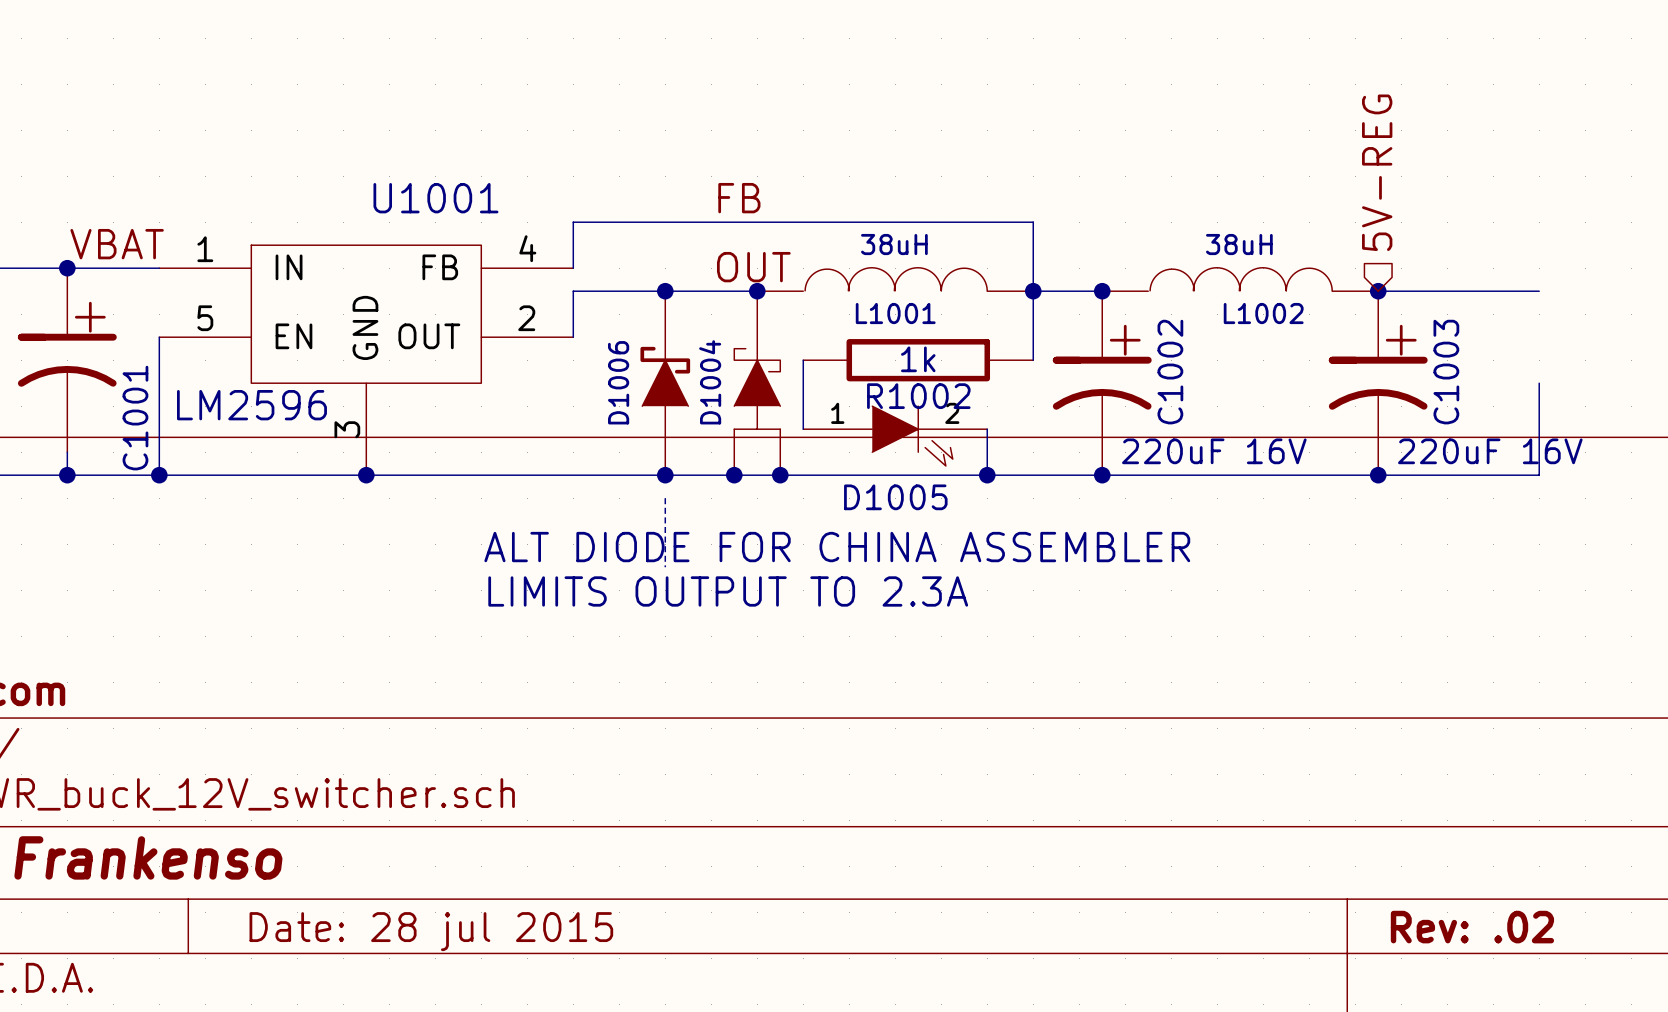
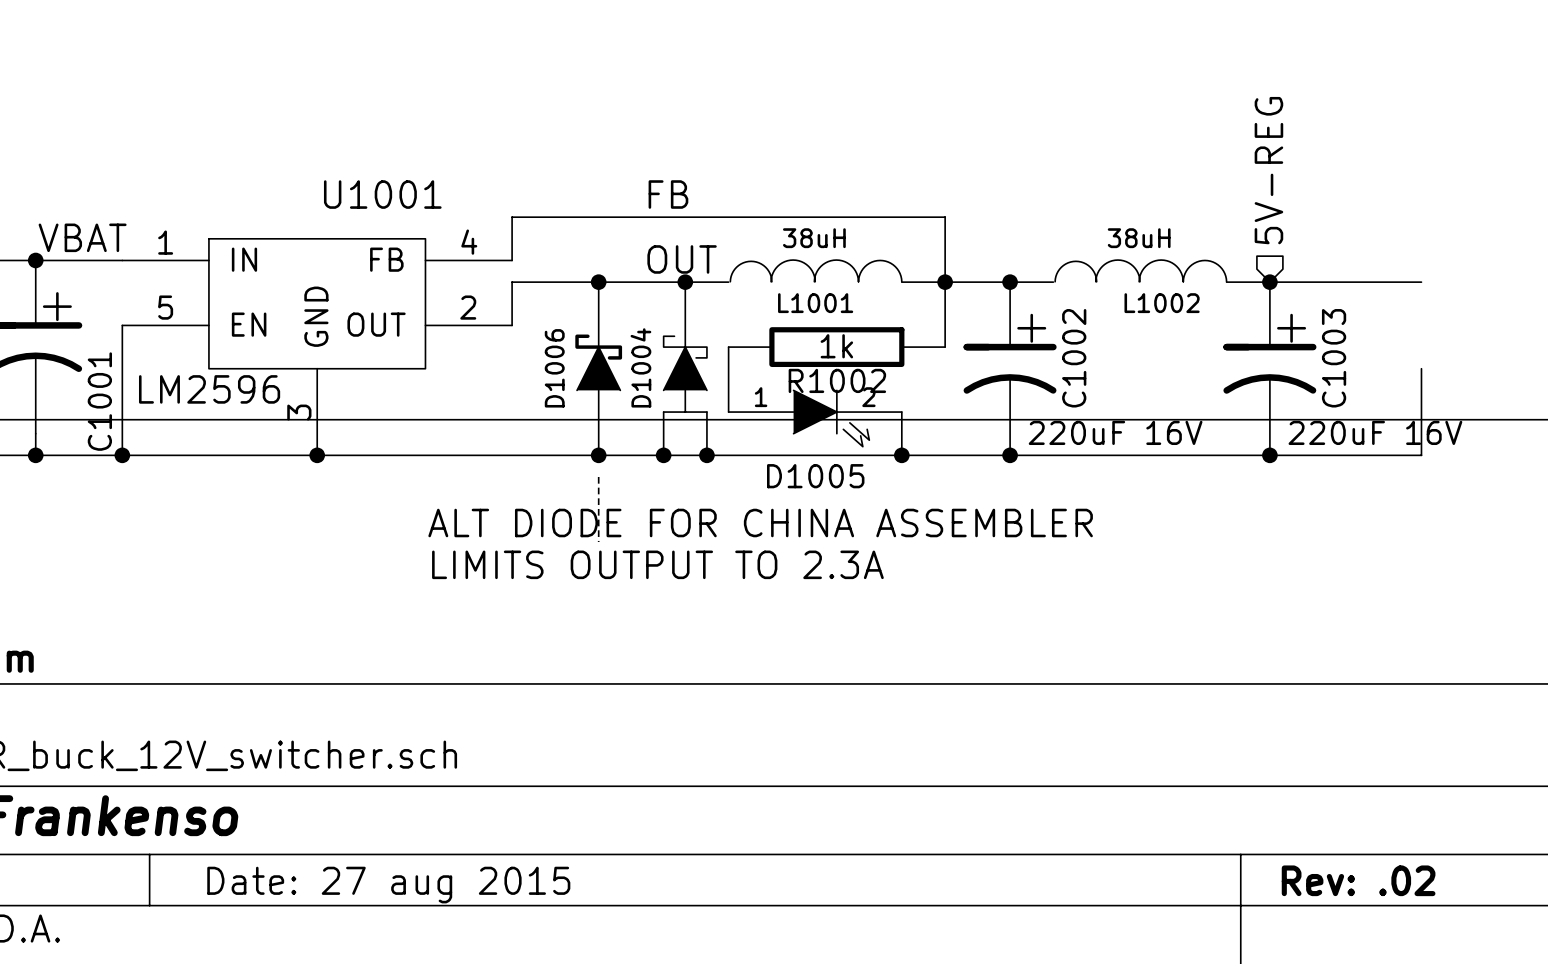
title block: Date: 28 jul 2015 (431, 931) -> Date: 27 aug 2015 (388, 885)

